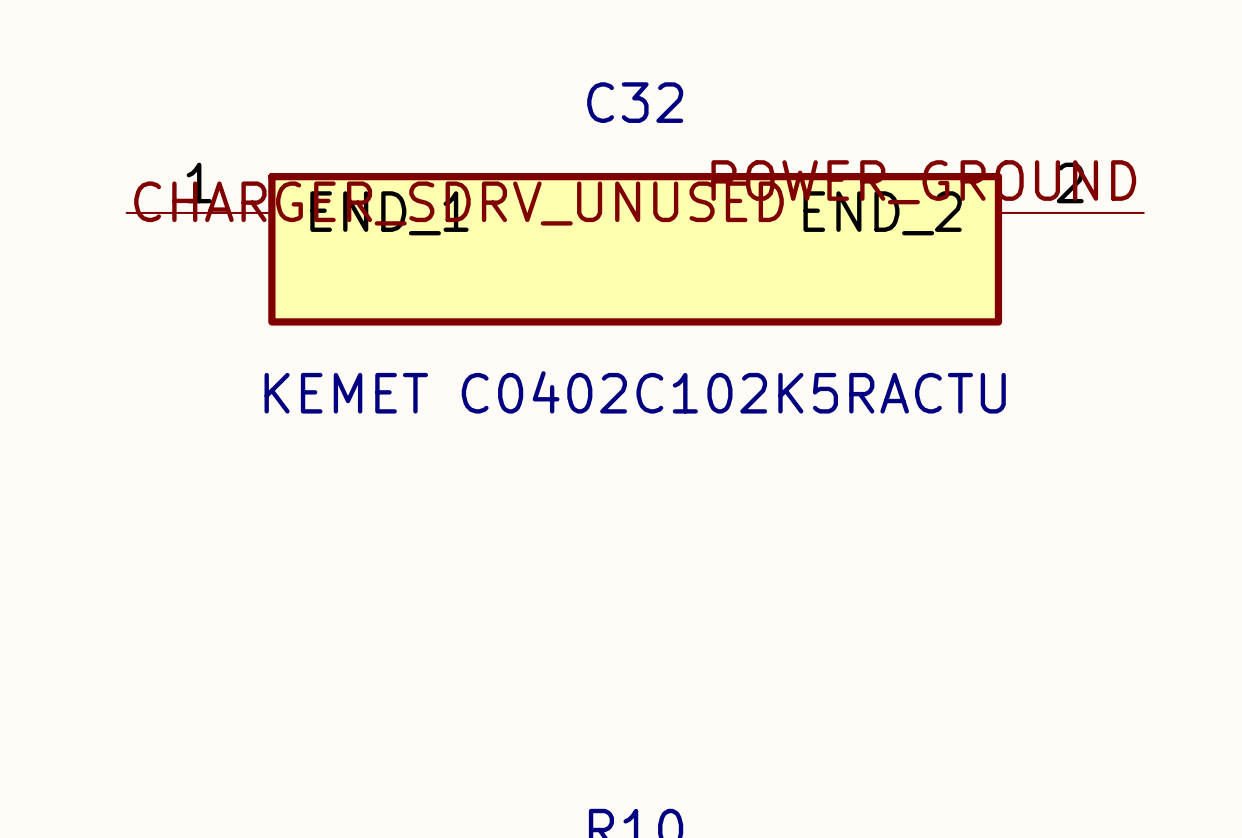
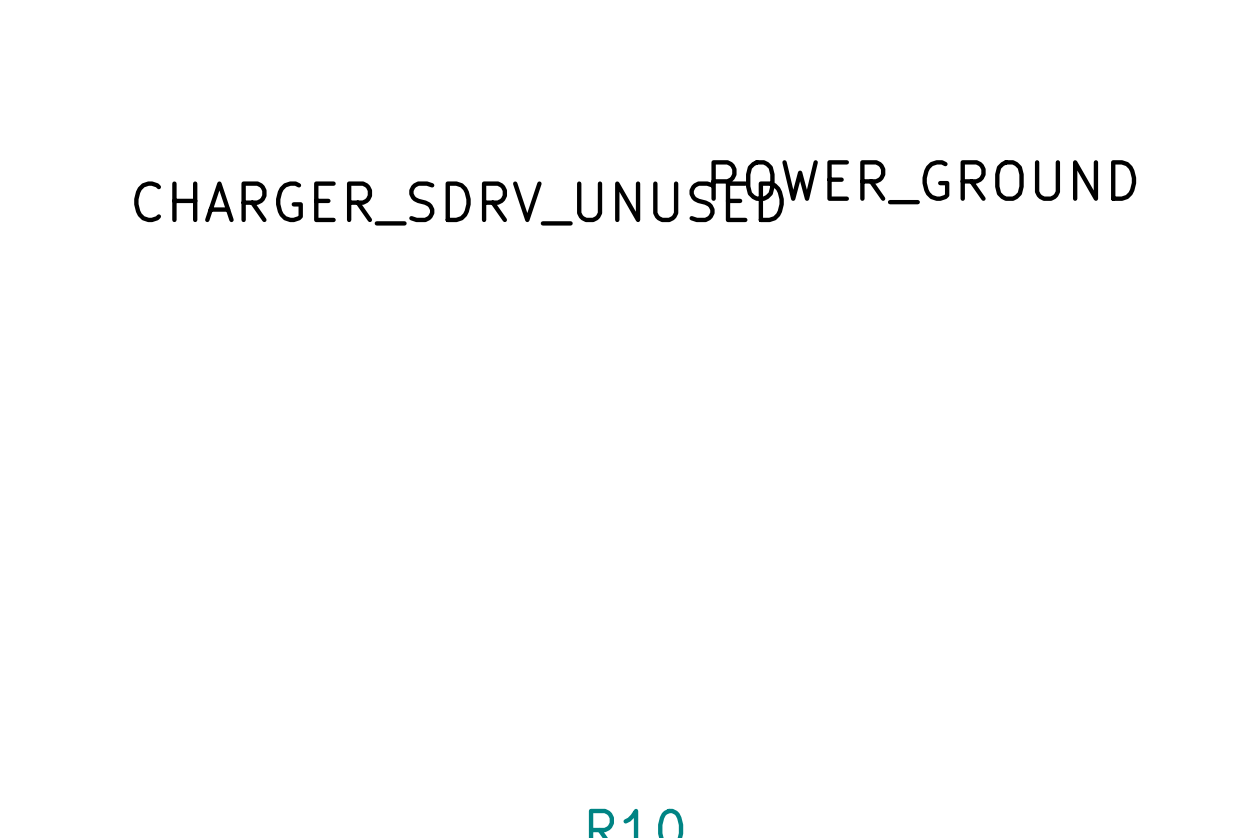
C32: KEMET C0402C102K5RACTU (635, 249) -> none

